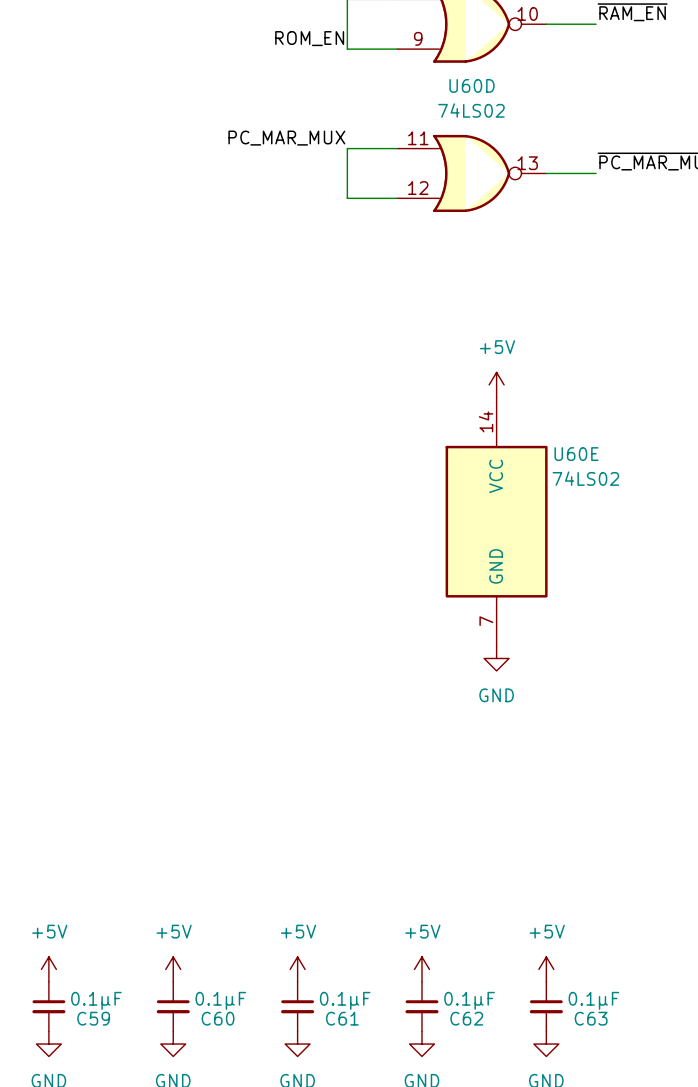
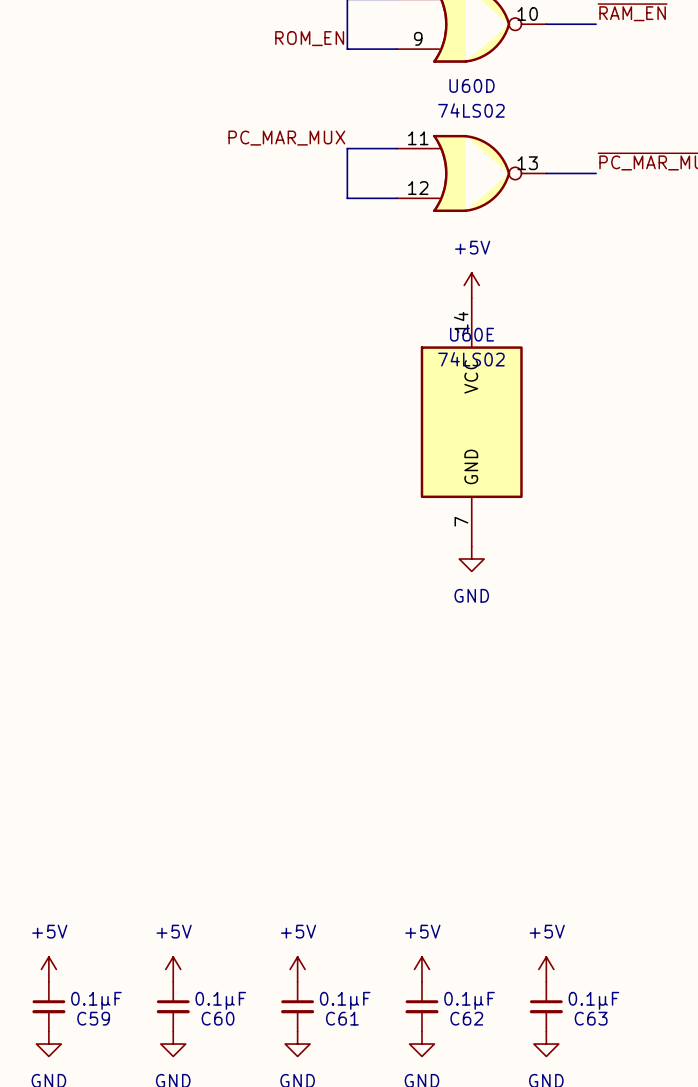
power symbol position: +5V (496, 384) -> +5V (471, 285)
U60E name position: U60E (576, 454) -> U60E (472, 334)
U60E value position: 74LS02 (585, 478) -> 74LS02 (471, 359)
U60E position: (496, 521) -> (471, 422)
power symbol position: GND (496, 658) -> GND (471, 559)

